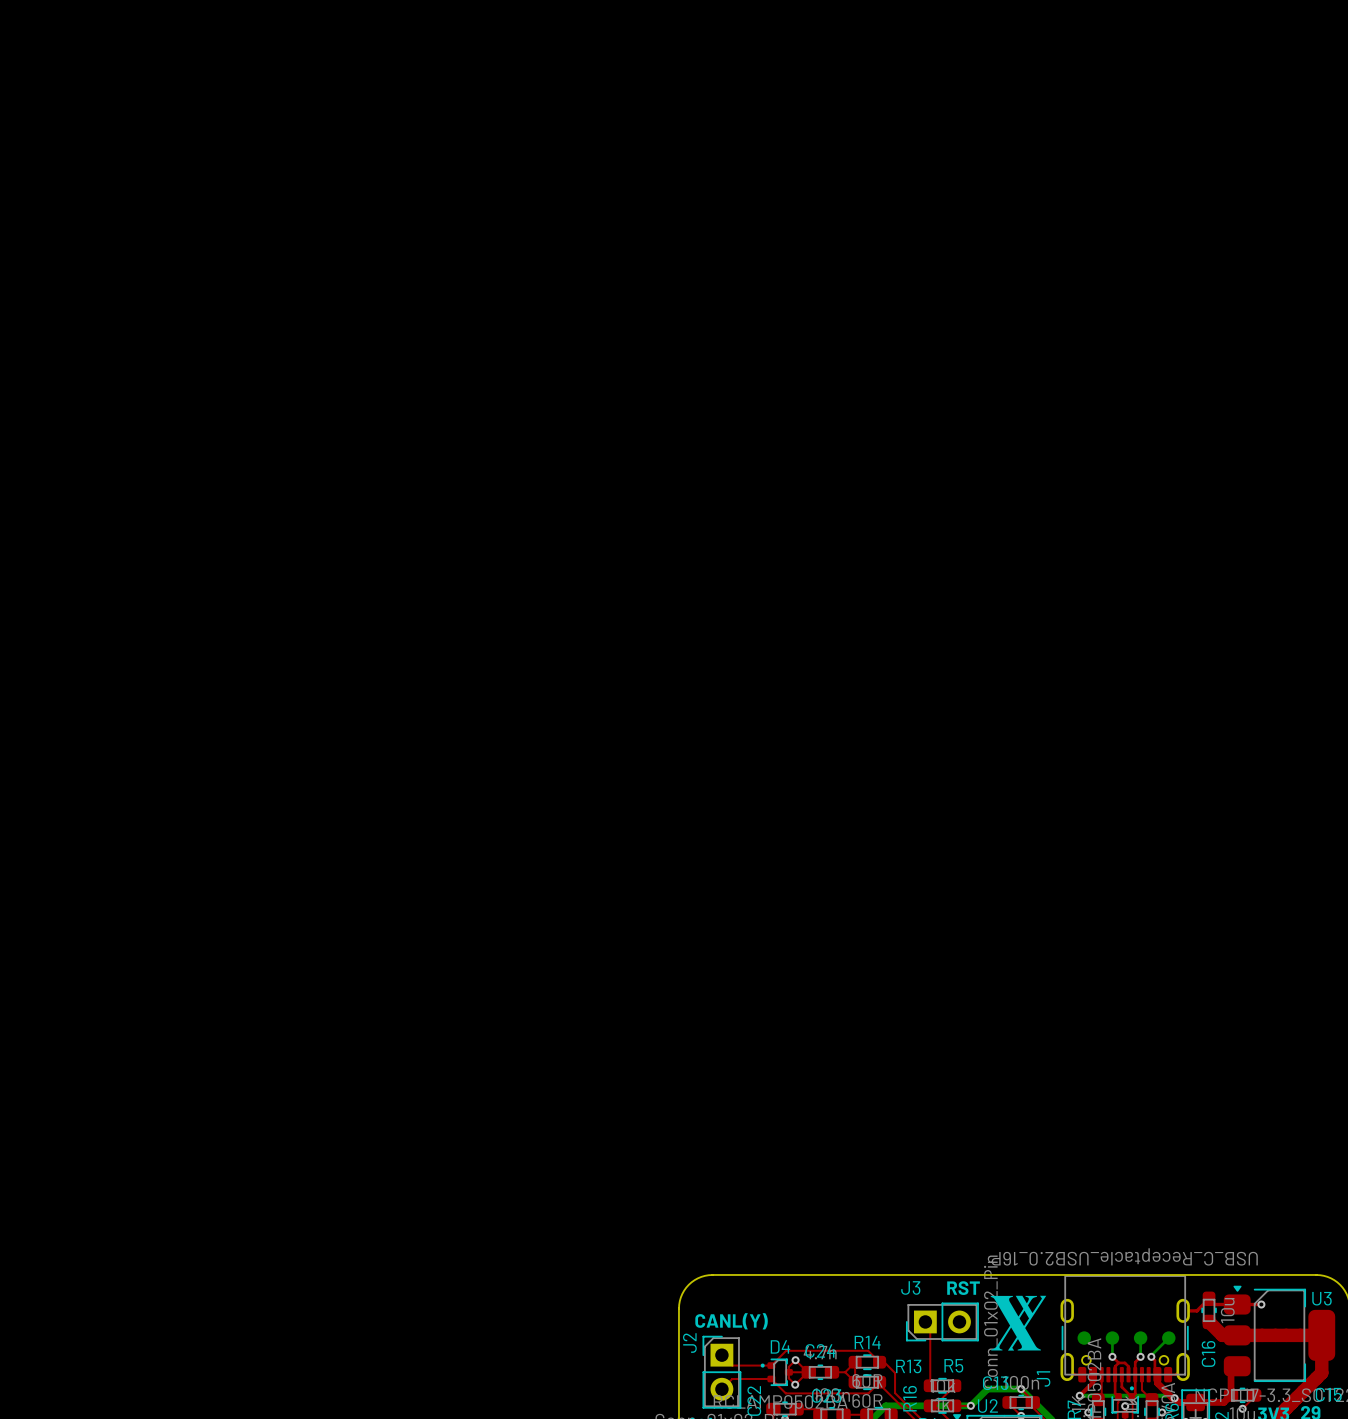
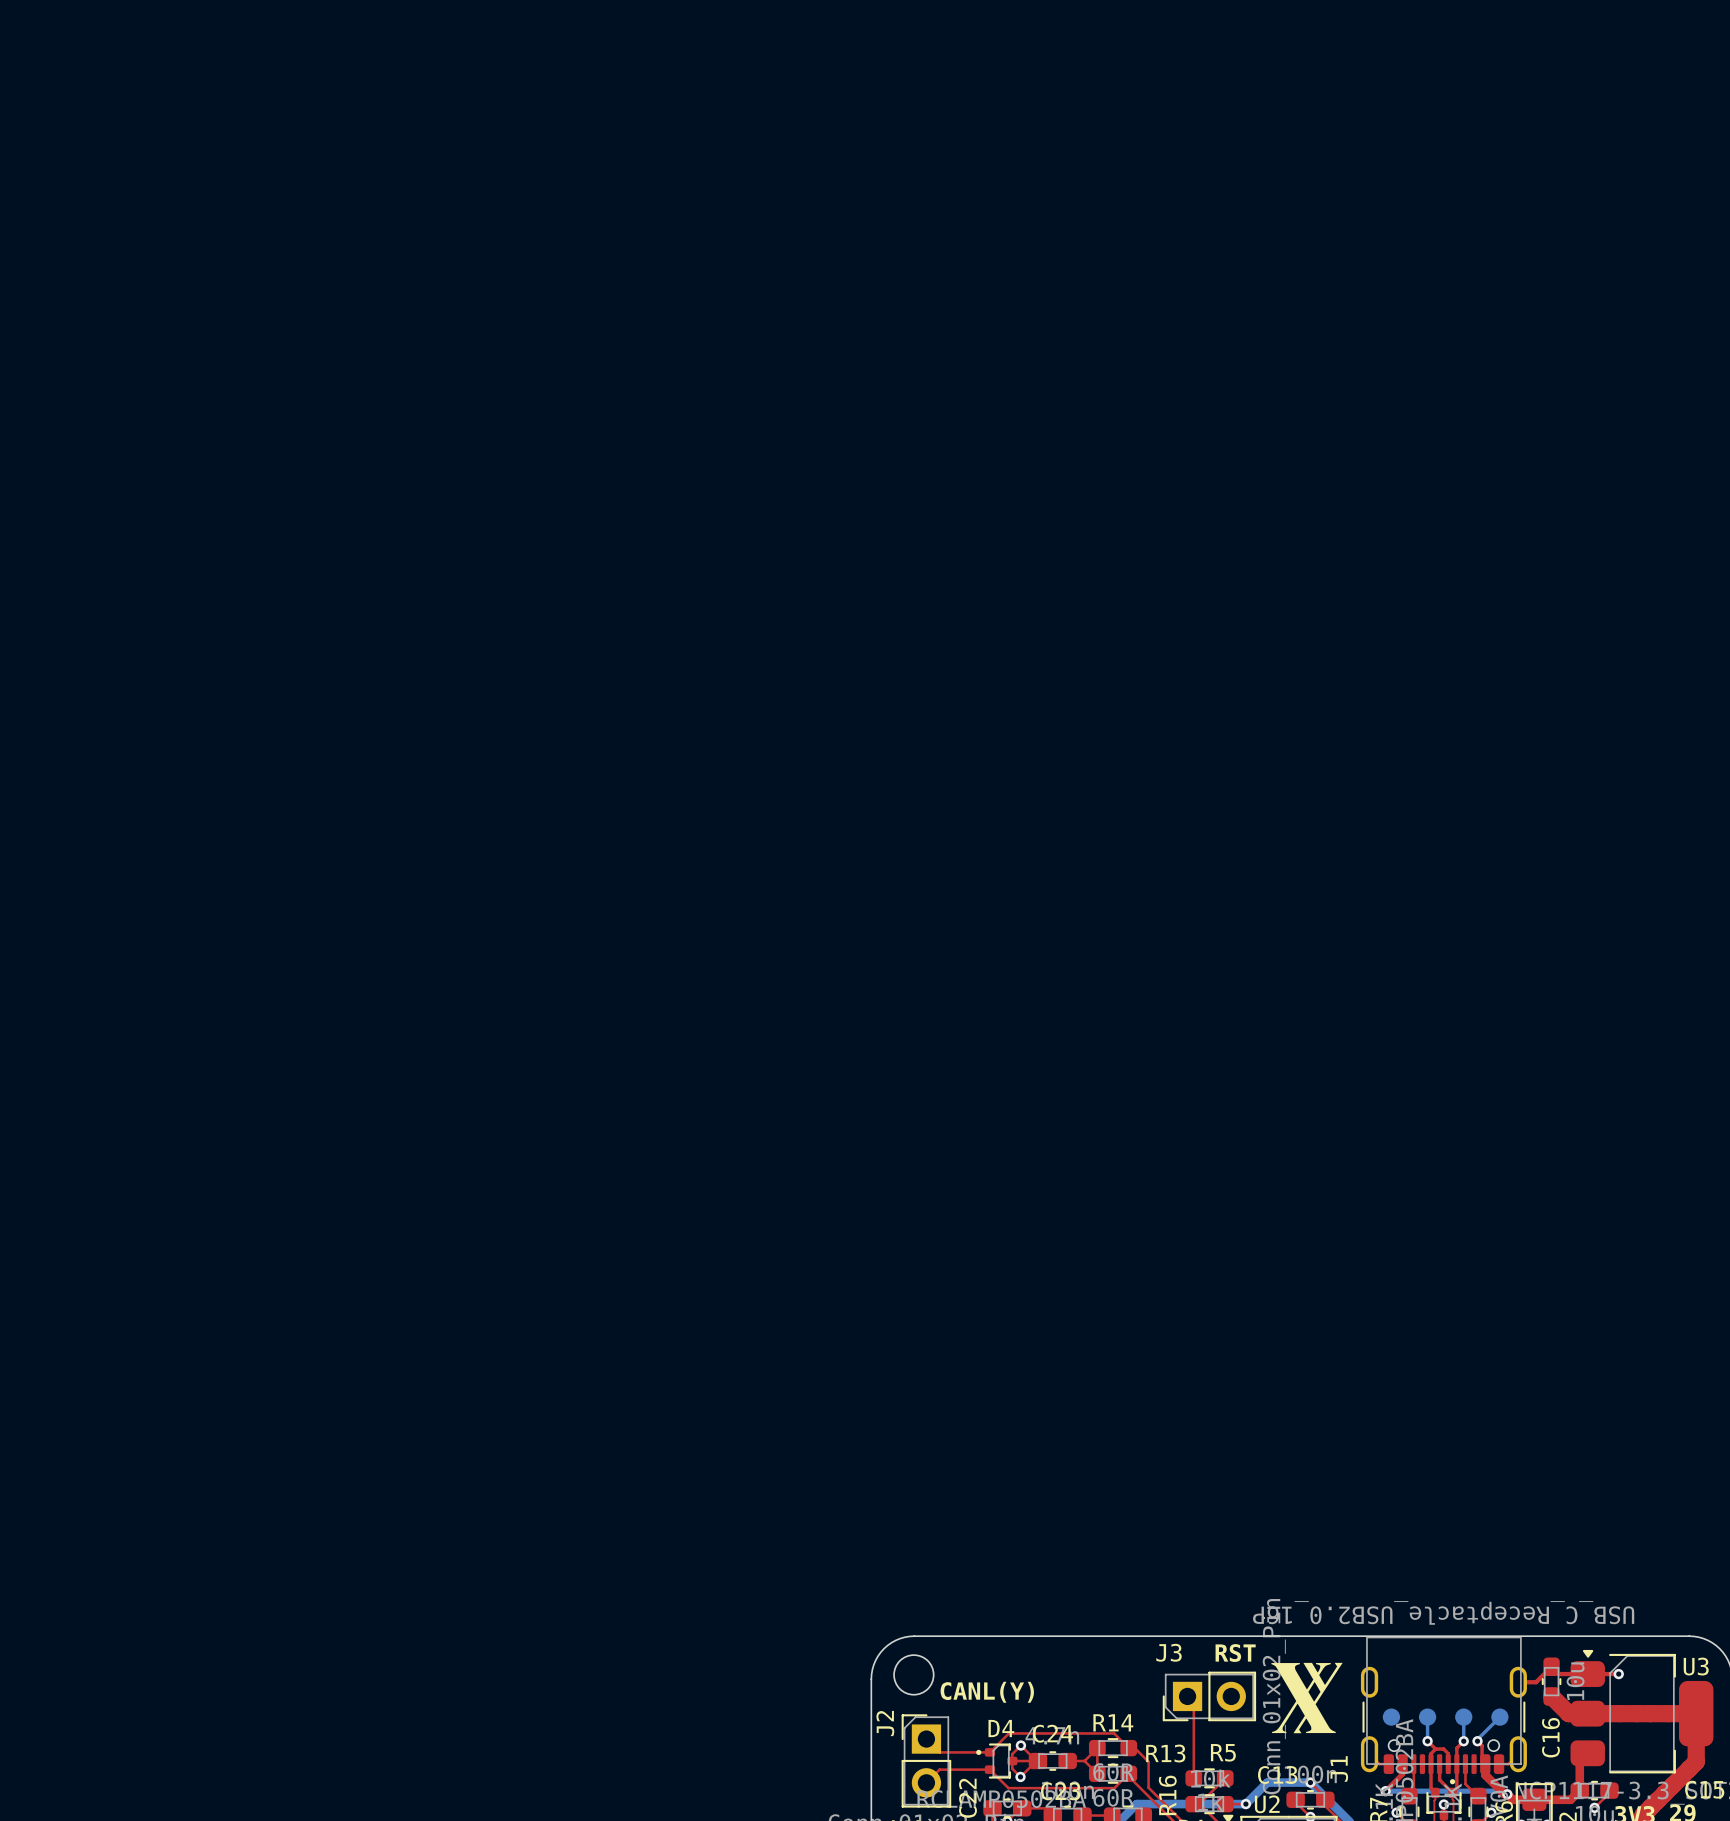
round board edge: none -> [893, 1654, 935, 1696]
text position: CANL(Y) (731, 1321) -> CANL(Y) (987, 1692)

